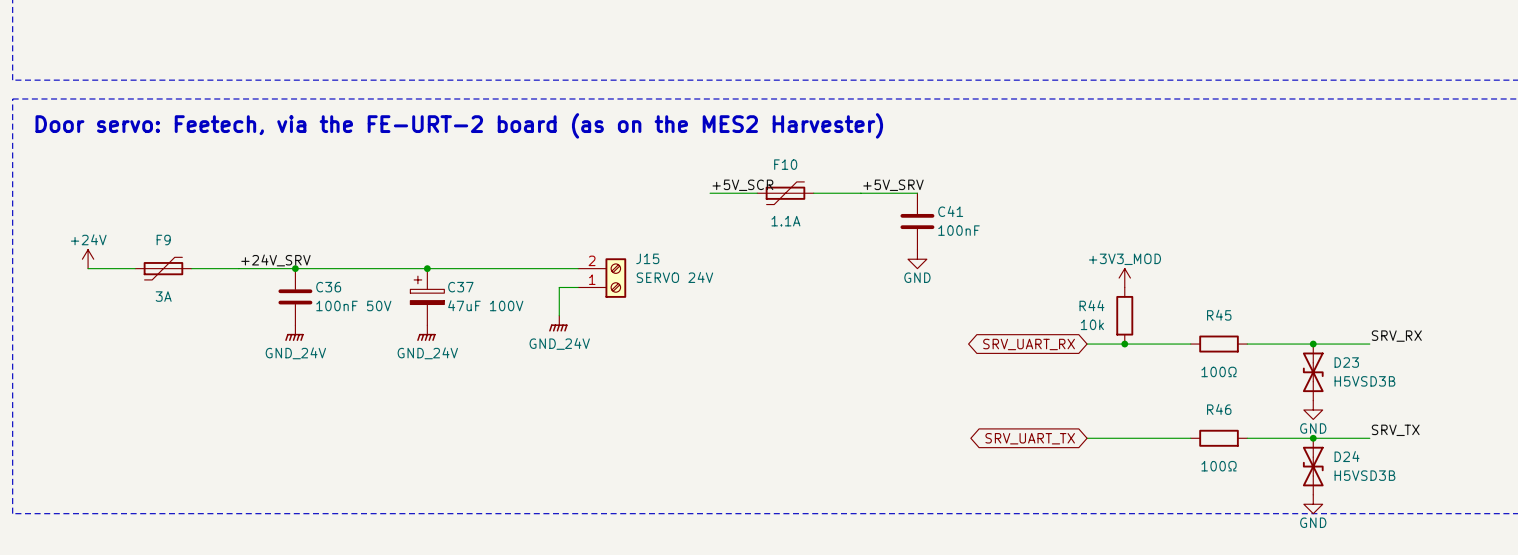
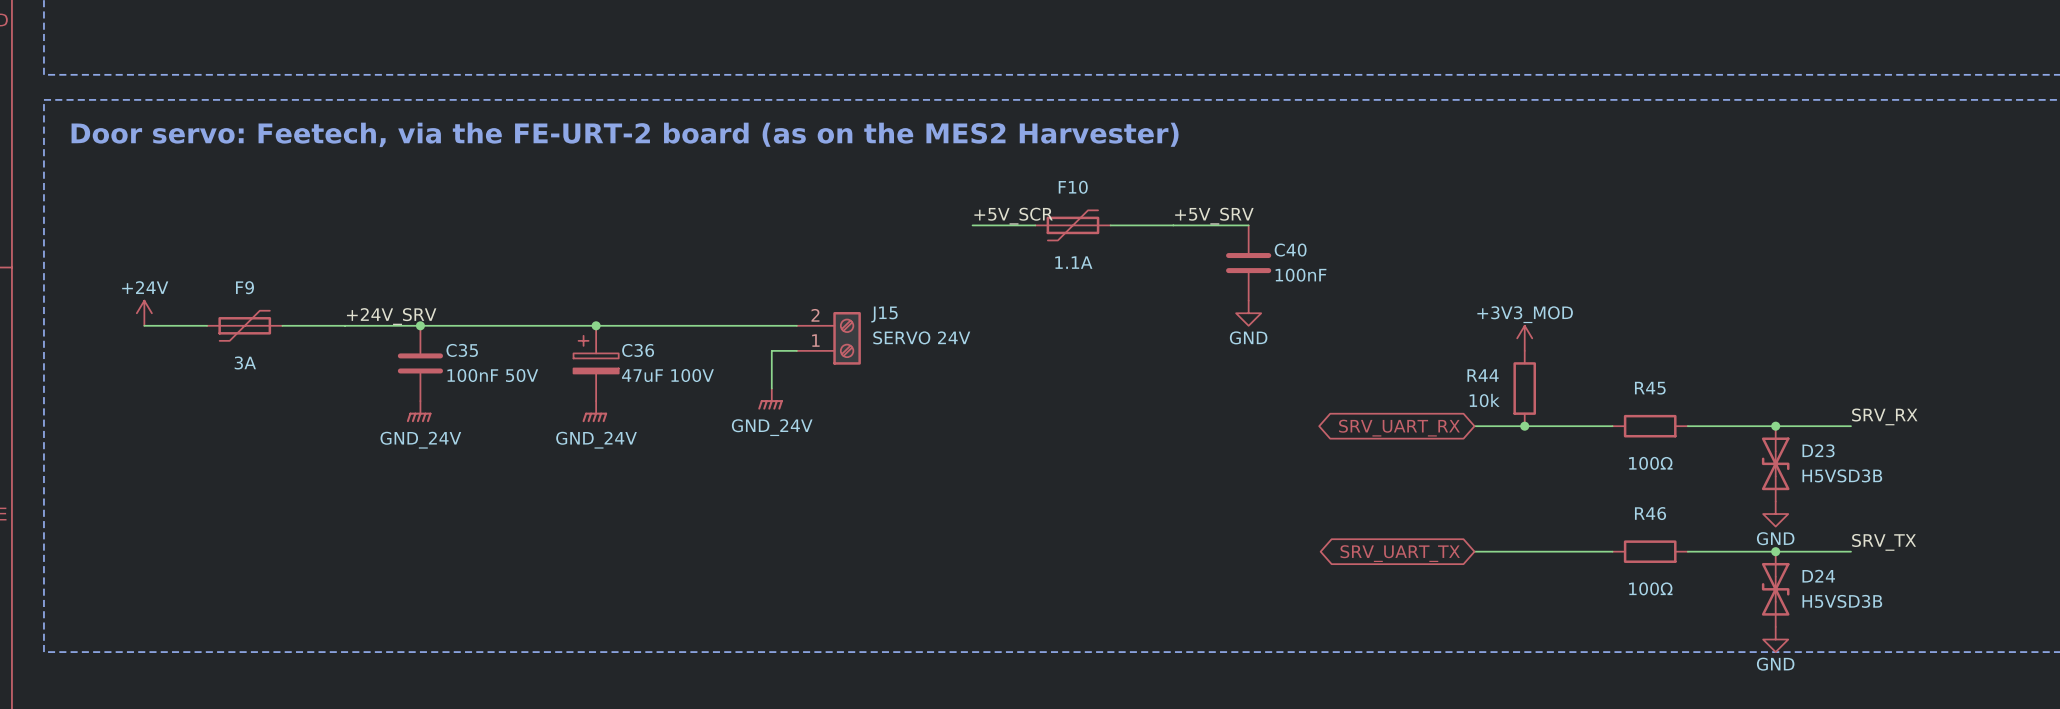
C41 name: C41 (950, 211) -> C40 (1290, 250)
C36 name: C36 (328, 287) -> C35 (462, 350)
C37 name: C37 (460, 287) -> C36 (638, 350)

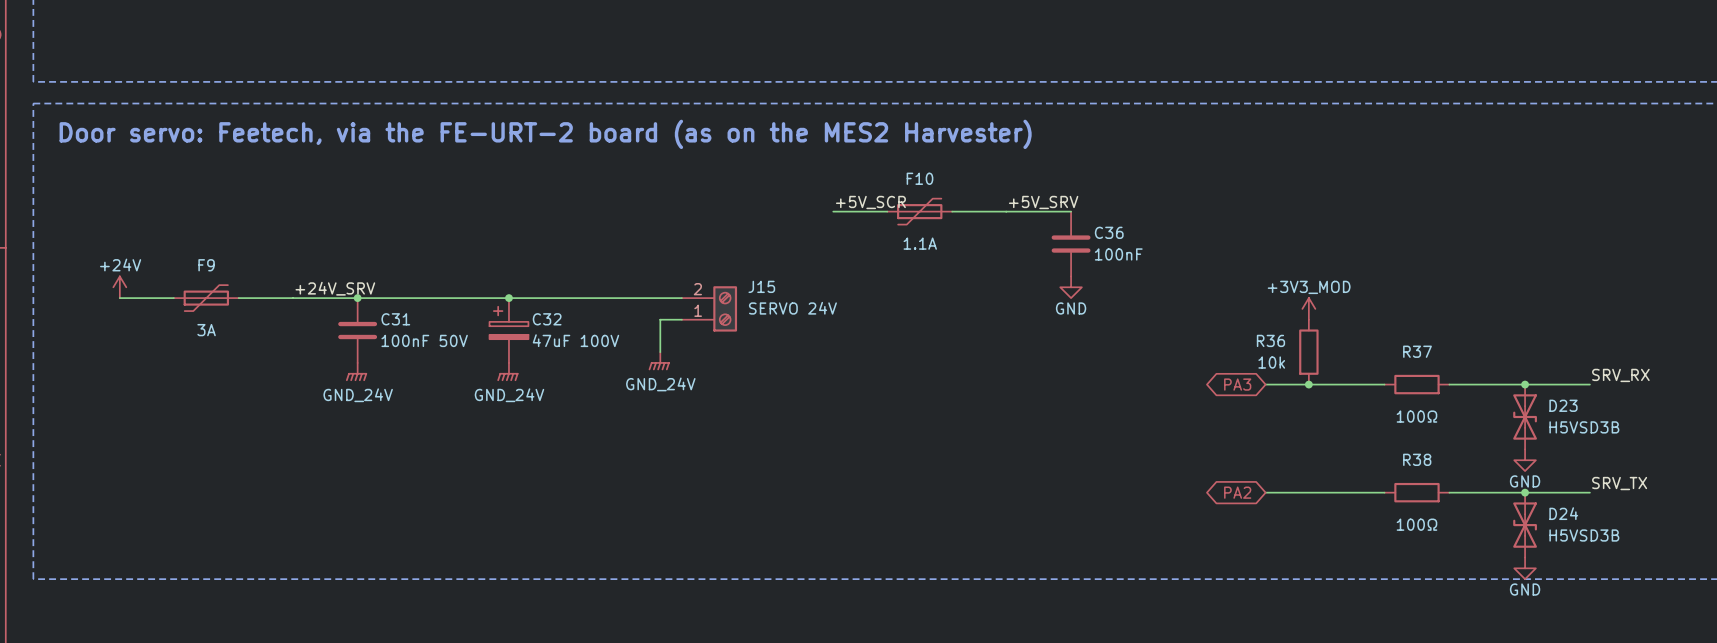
C40 name: C40 (1290, 250) -> C36 (1109, 232)
C35 name: C35 (462, 350) -> C31 (395, 319)
C36 name: C36 (638, 350) -> C32 (547, 319)
R44 name: R44 (1483, 375) -> R36 (1270, 340)
R45 name: R45 (1650, 388) -> R37 (1417, 351)
global label: SRV_UART_RX (1399, 428) -> PA3 (1237, 384)
R46 name: R46 (1650, 513) -> R38 (1417, 459)
global label: SRV_UART_TX (1400, 553) -> PA2 (1237, 492)

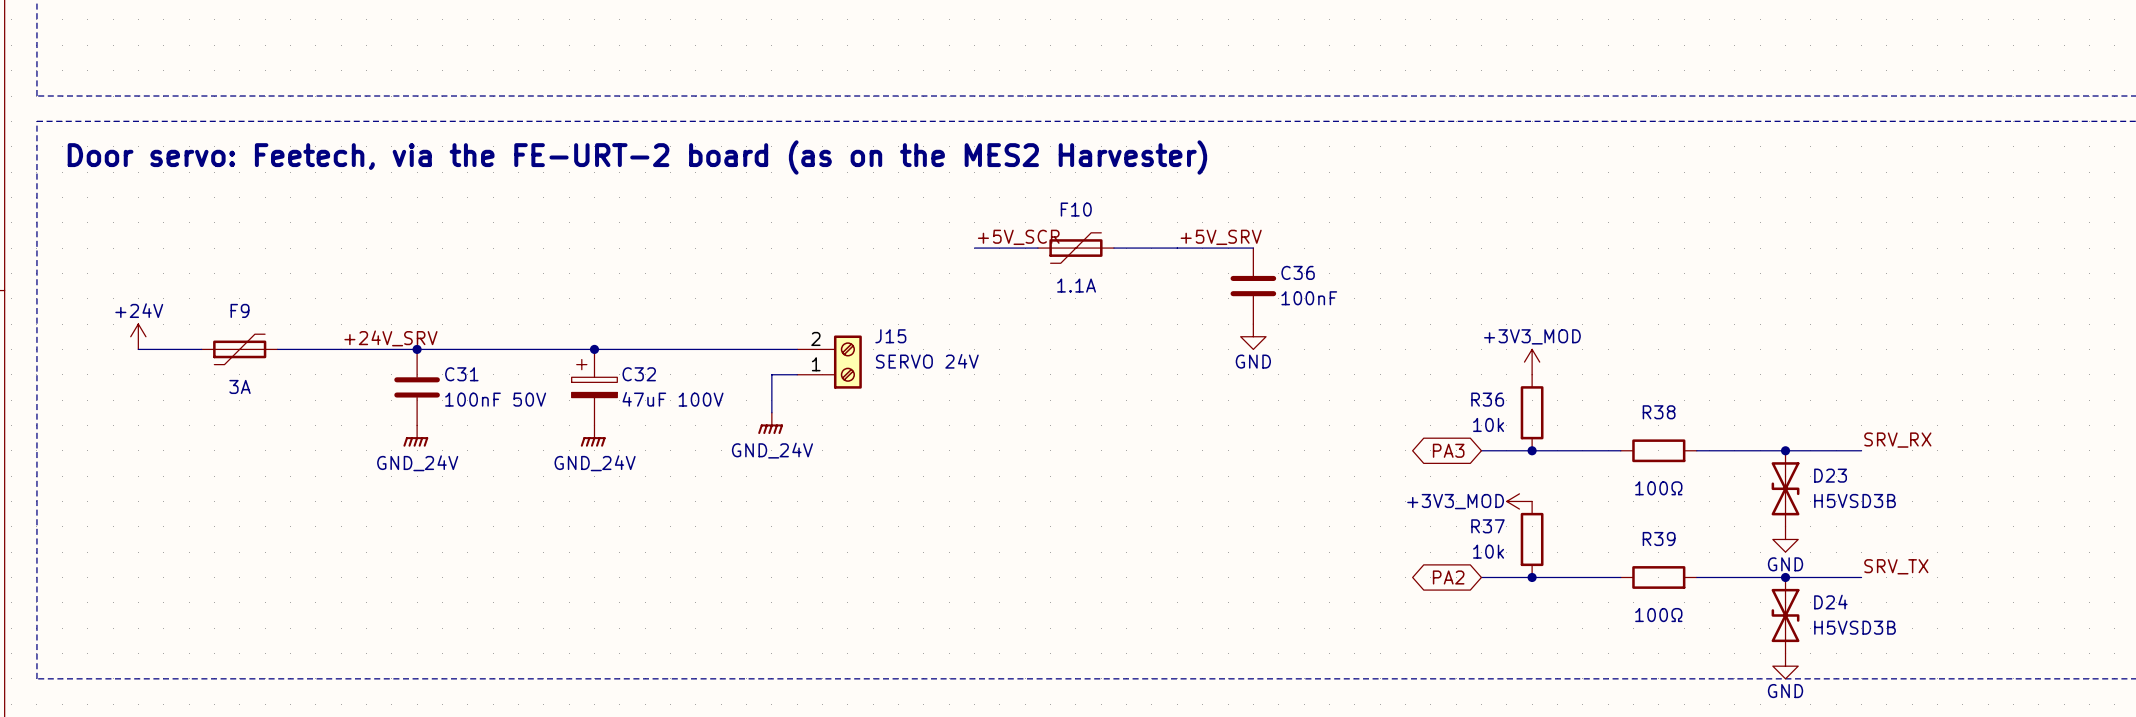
R37 name: R37 (1417, 351) -> R38 (1659, 412)
power symbol: none -> +3V3_MOD (1519, 501)
R38 name: R38 (1417, 459) -> R39 (1659, 539)
R37: none -> 10k (1532, 539)
junction: none -> (1532, 577)

